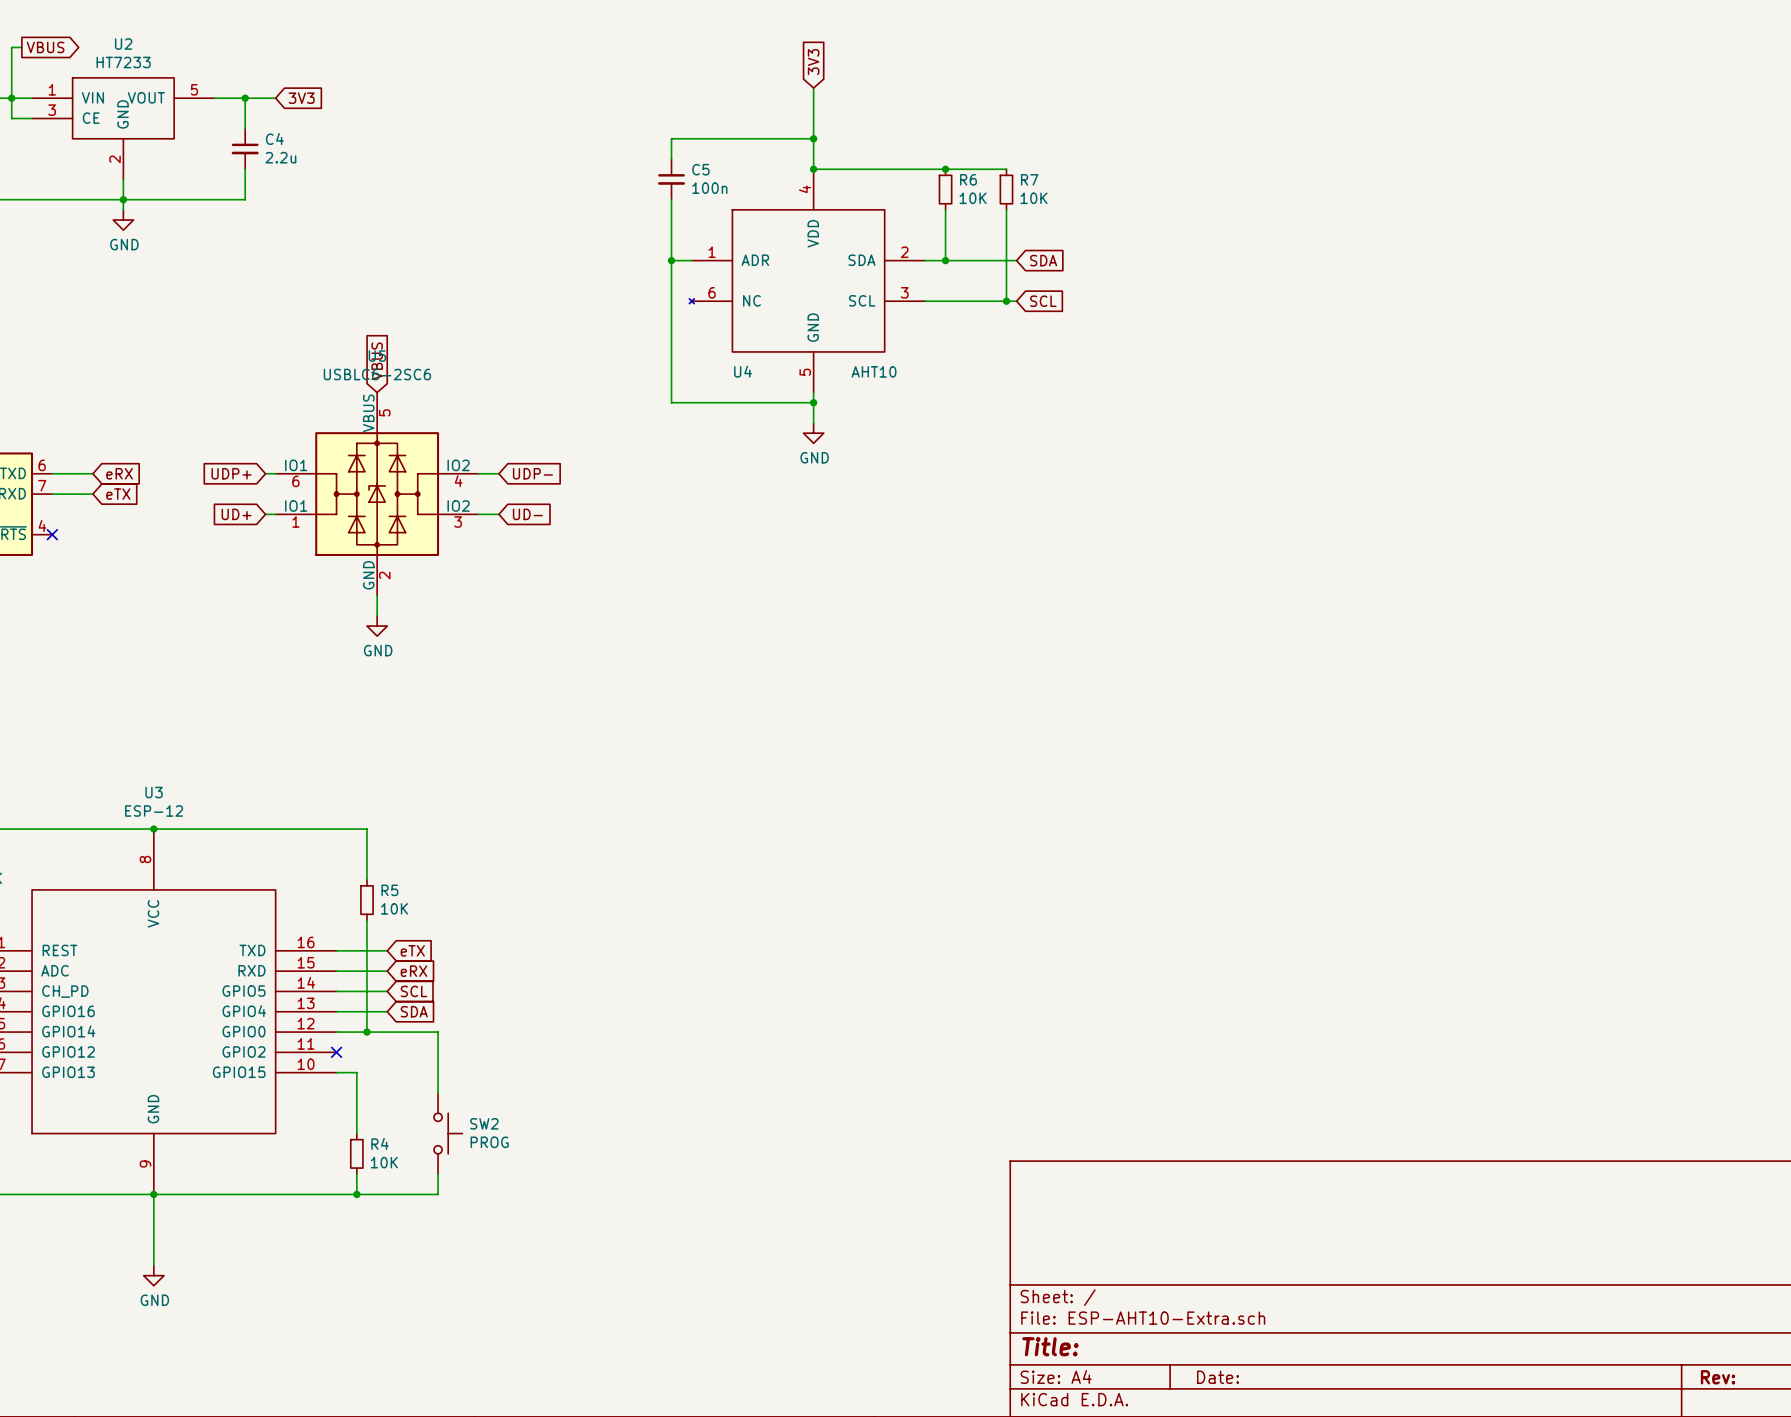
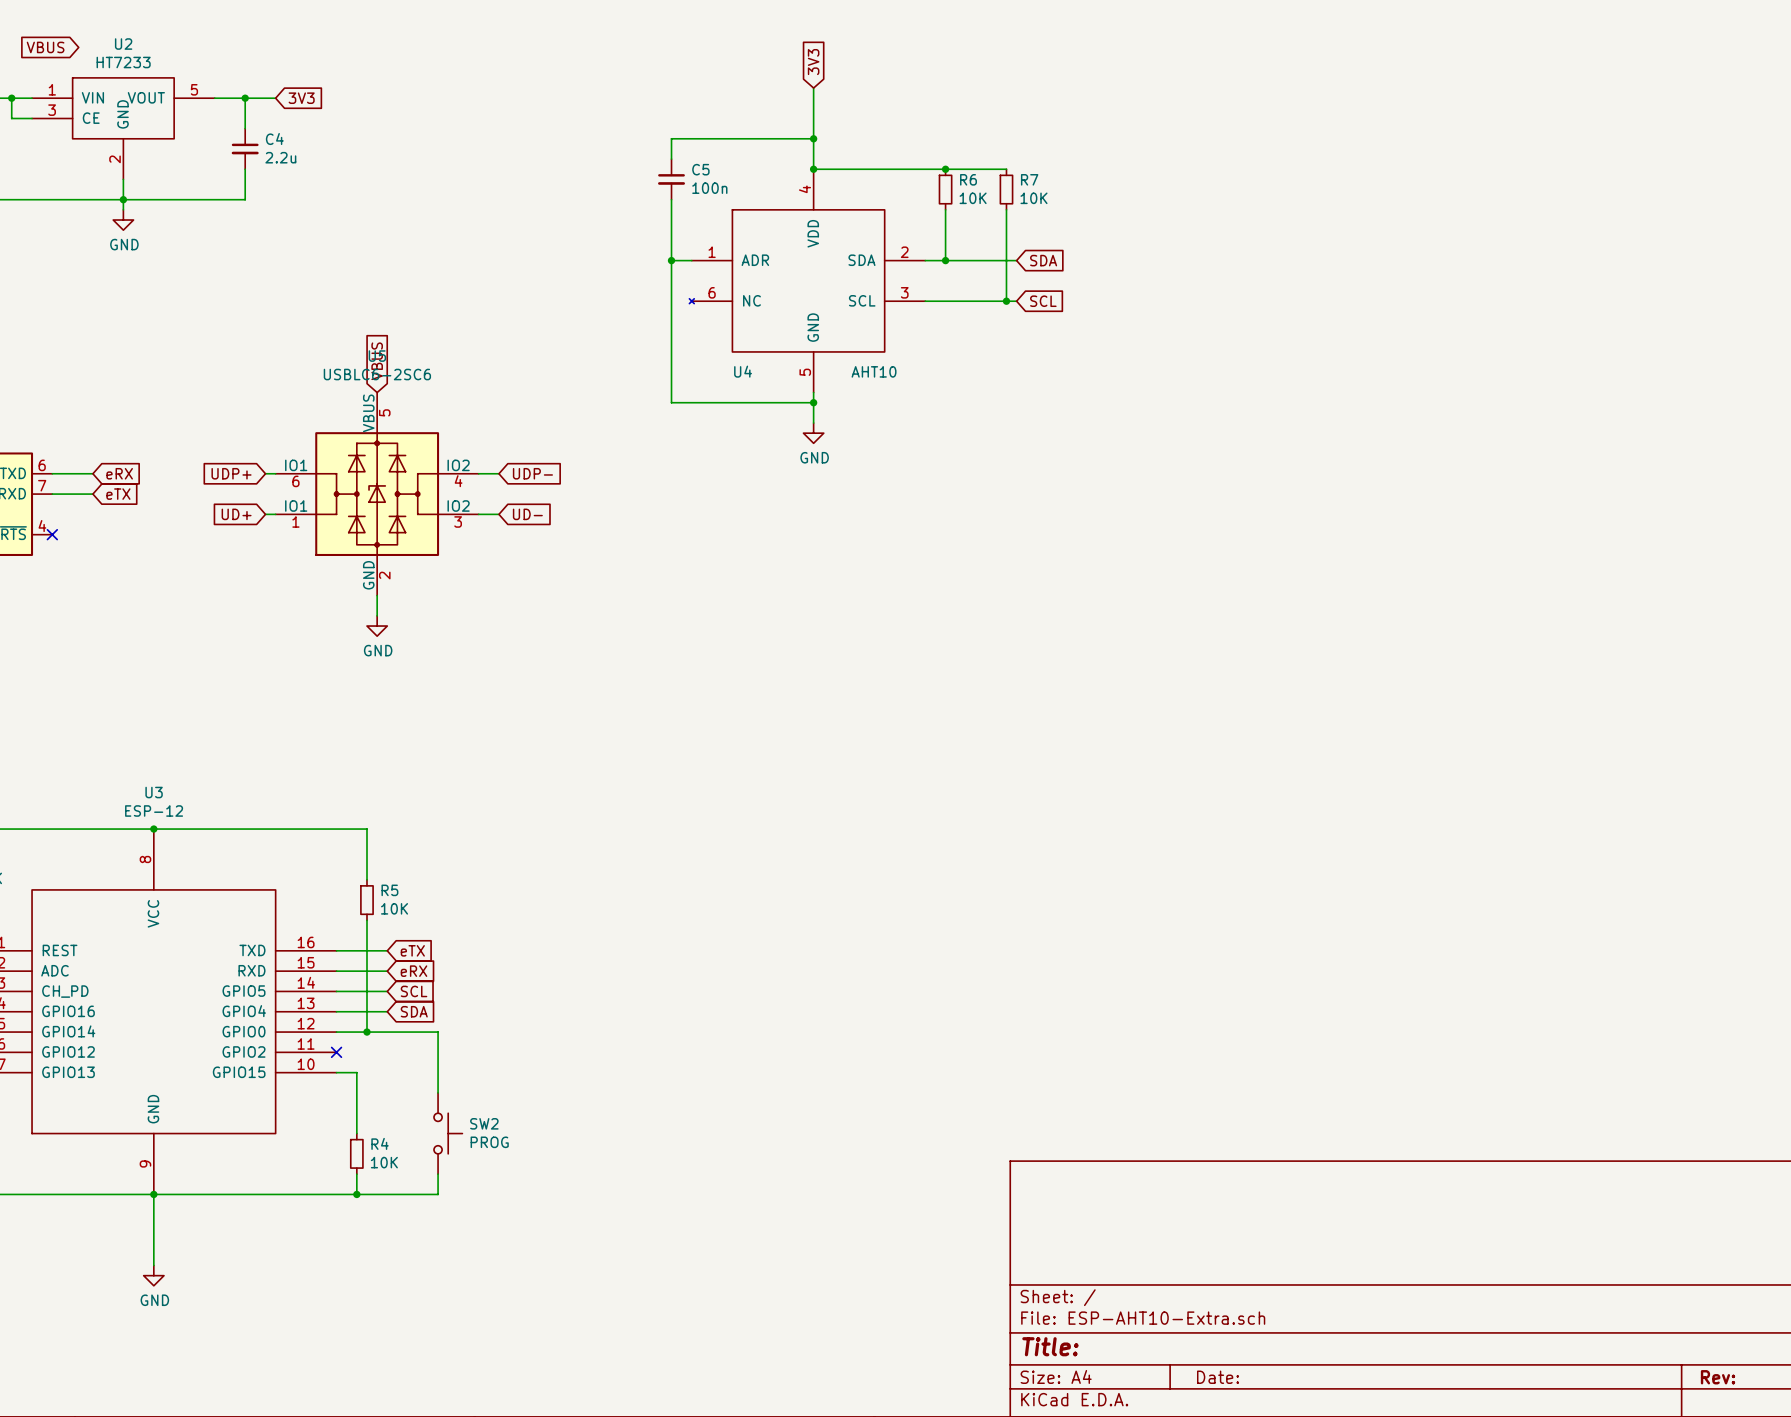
wire: (21, 47) (11, 47) (11, 98) -> none

